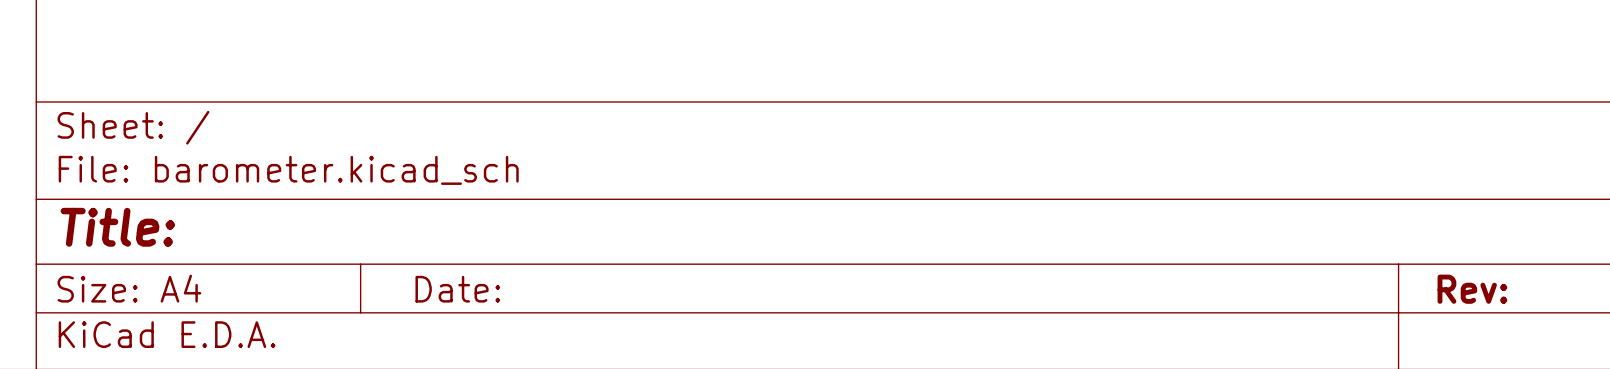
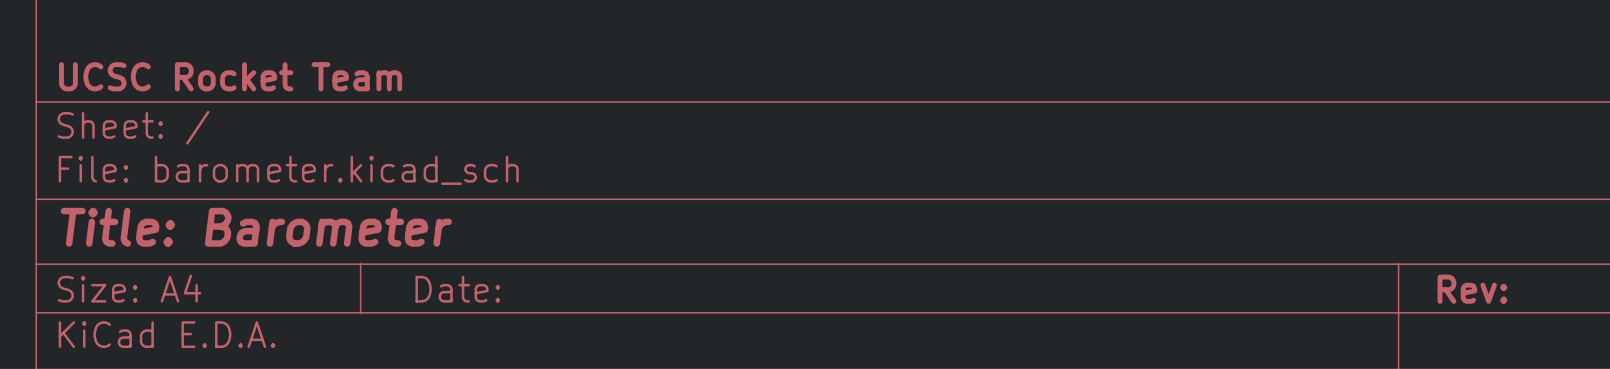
title block: none -> UCSC Rocket Team (230, 76)
title block: Title: (117, 227) -> Title: Barometer (256, 227)

